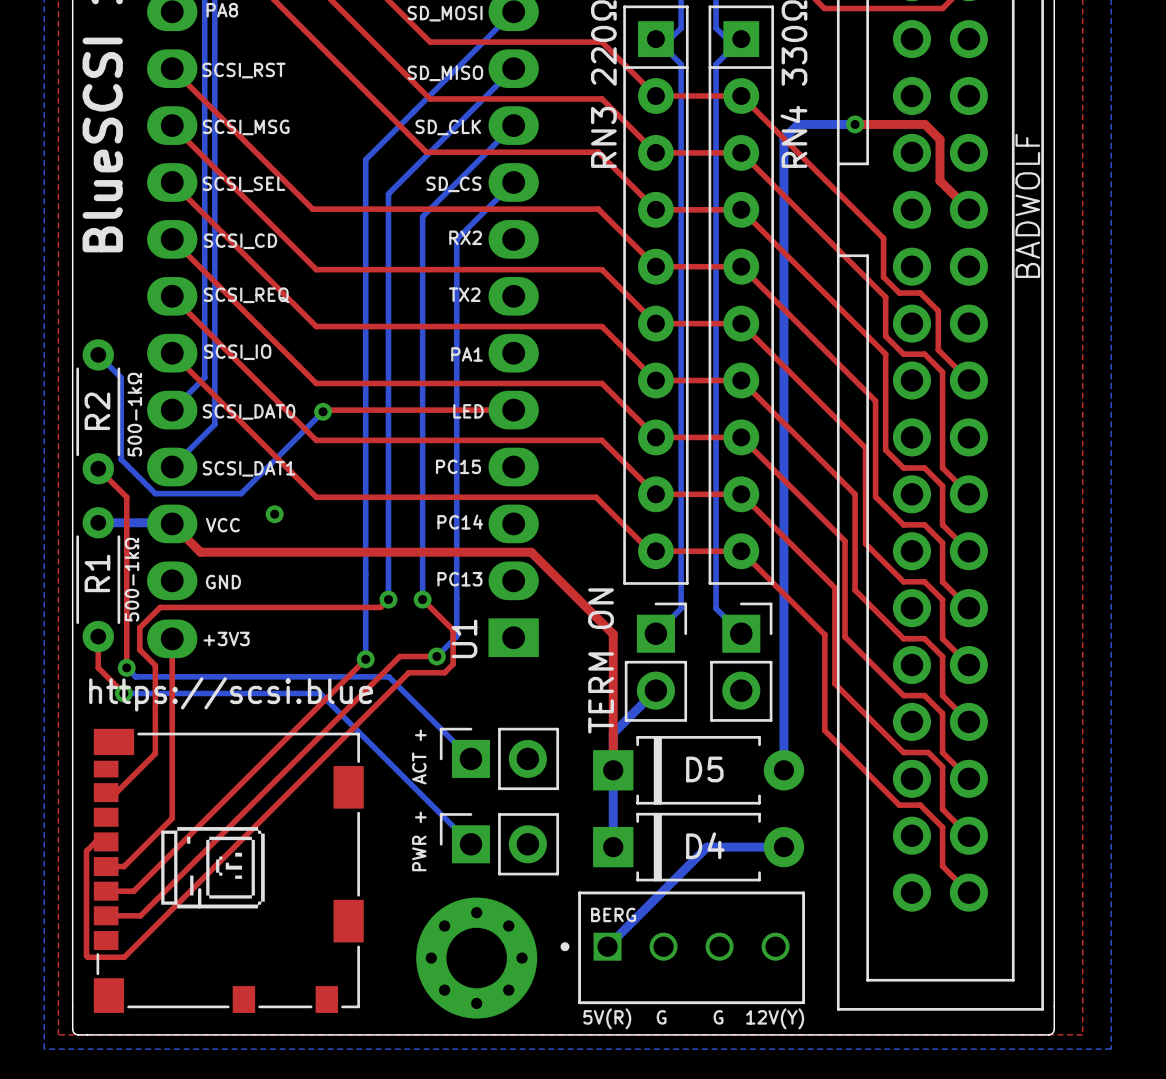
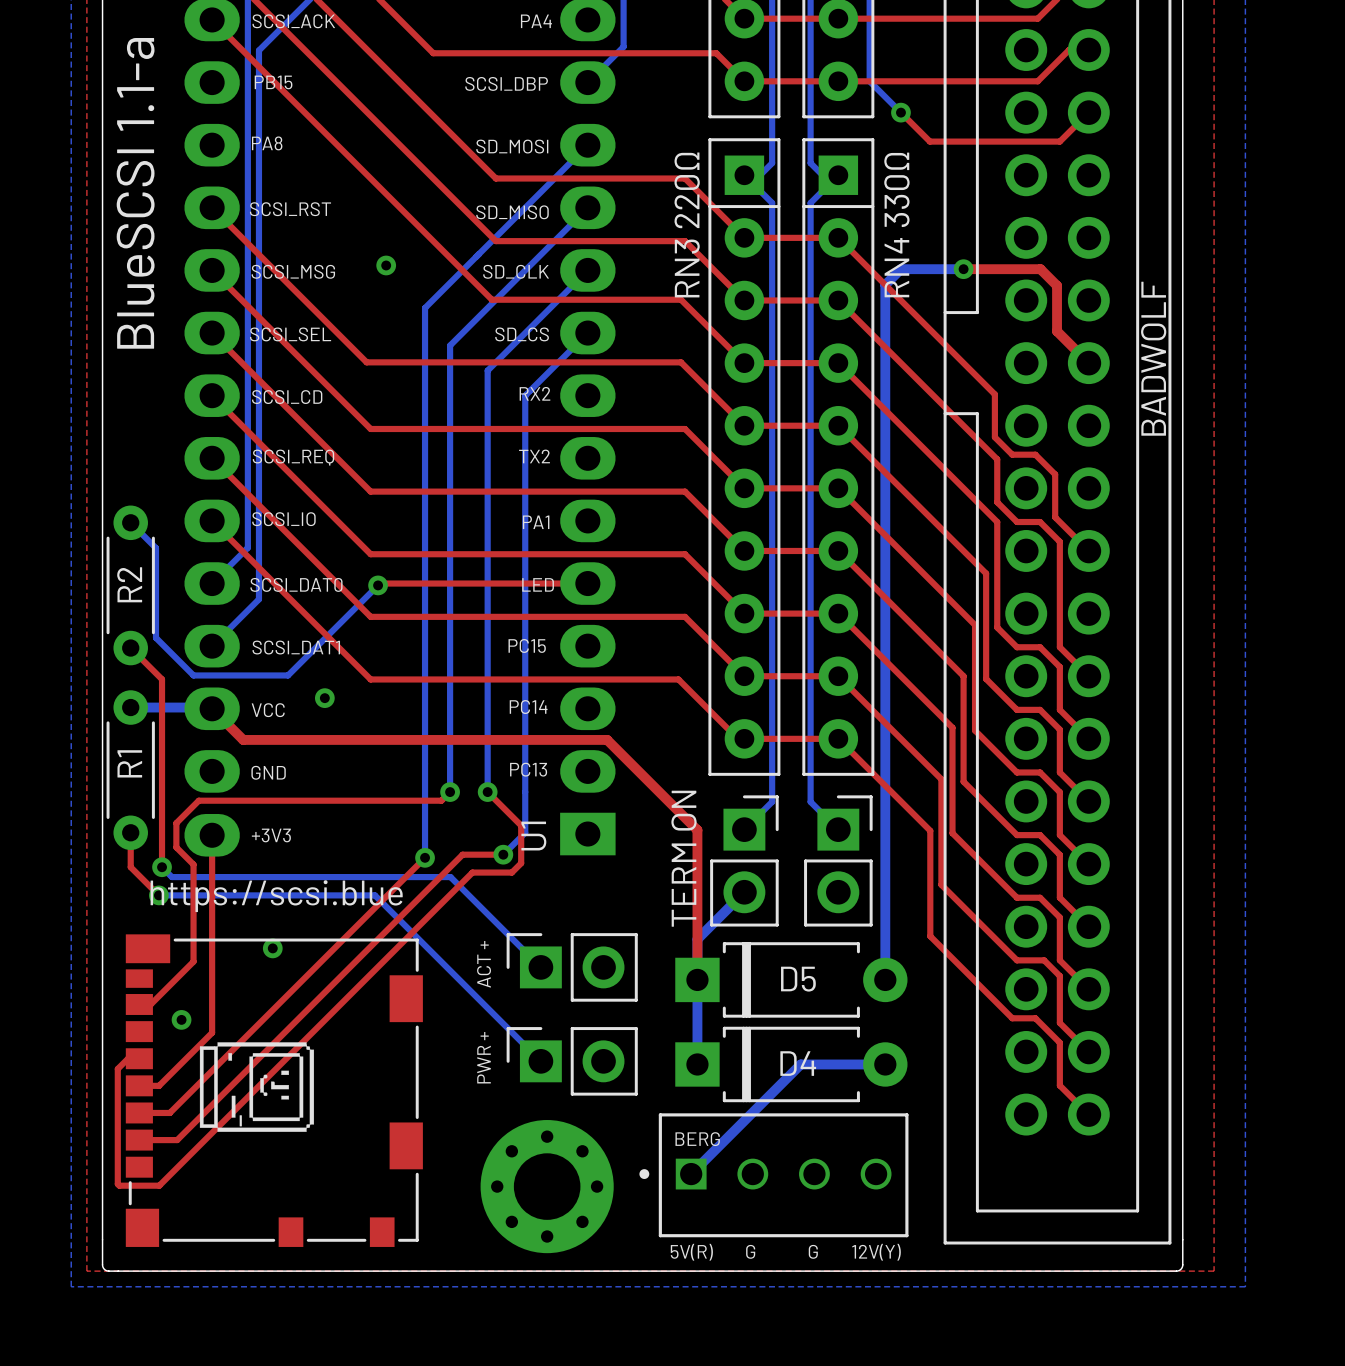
via: none -> (386, 265)
text: 500-1kΩ (134, 414) -> none
text: 500-1kΩ (131, 579) -> none
via: none -> (272, 948)
via: none -> (181, 1019)

